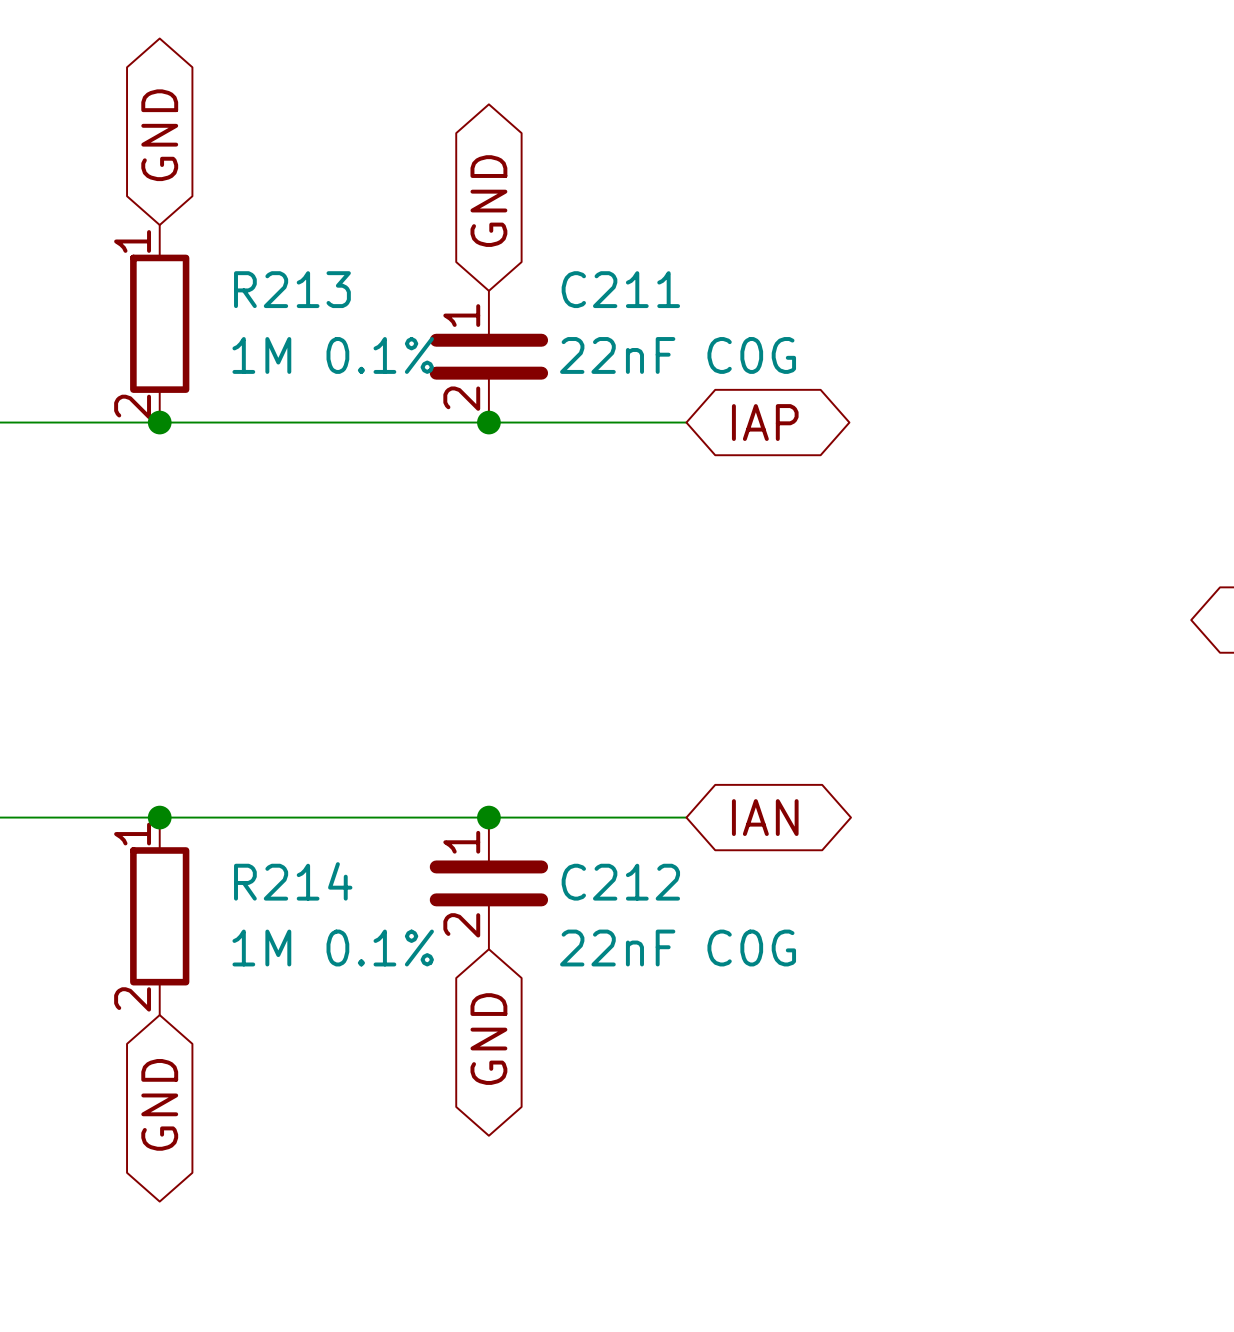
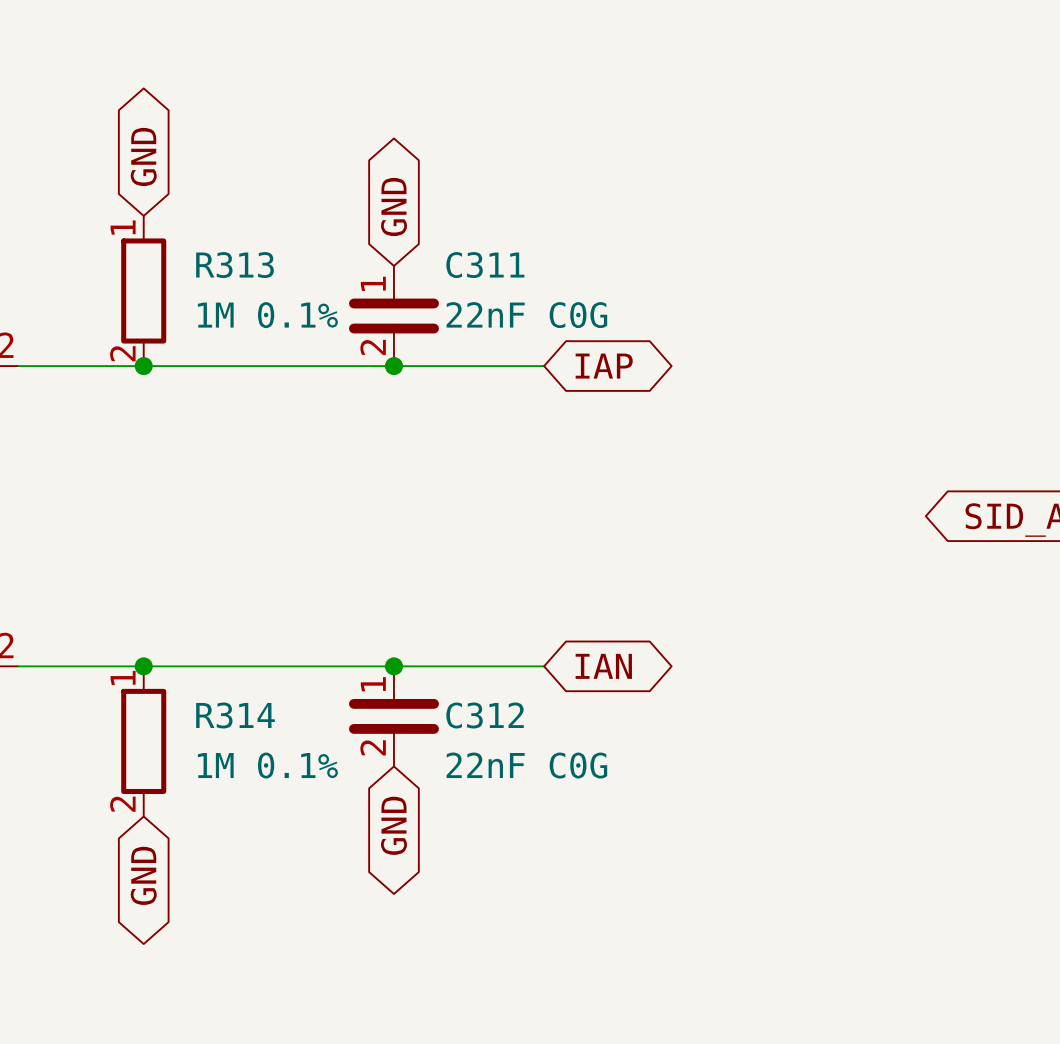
R213 name: R213 (292, 289) -> R313 (235, 265)
C211 name: C211 (620, 289) -> C311 (485, 265)
R214 name: R214 (293, 881) -> R314 (235, 715)
C212 name: C212 (620, 882) -> C312 (485, 715)

